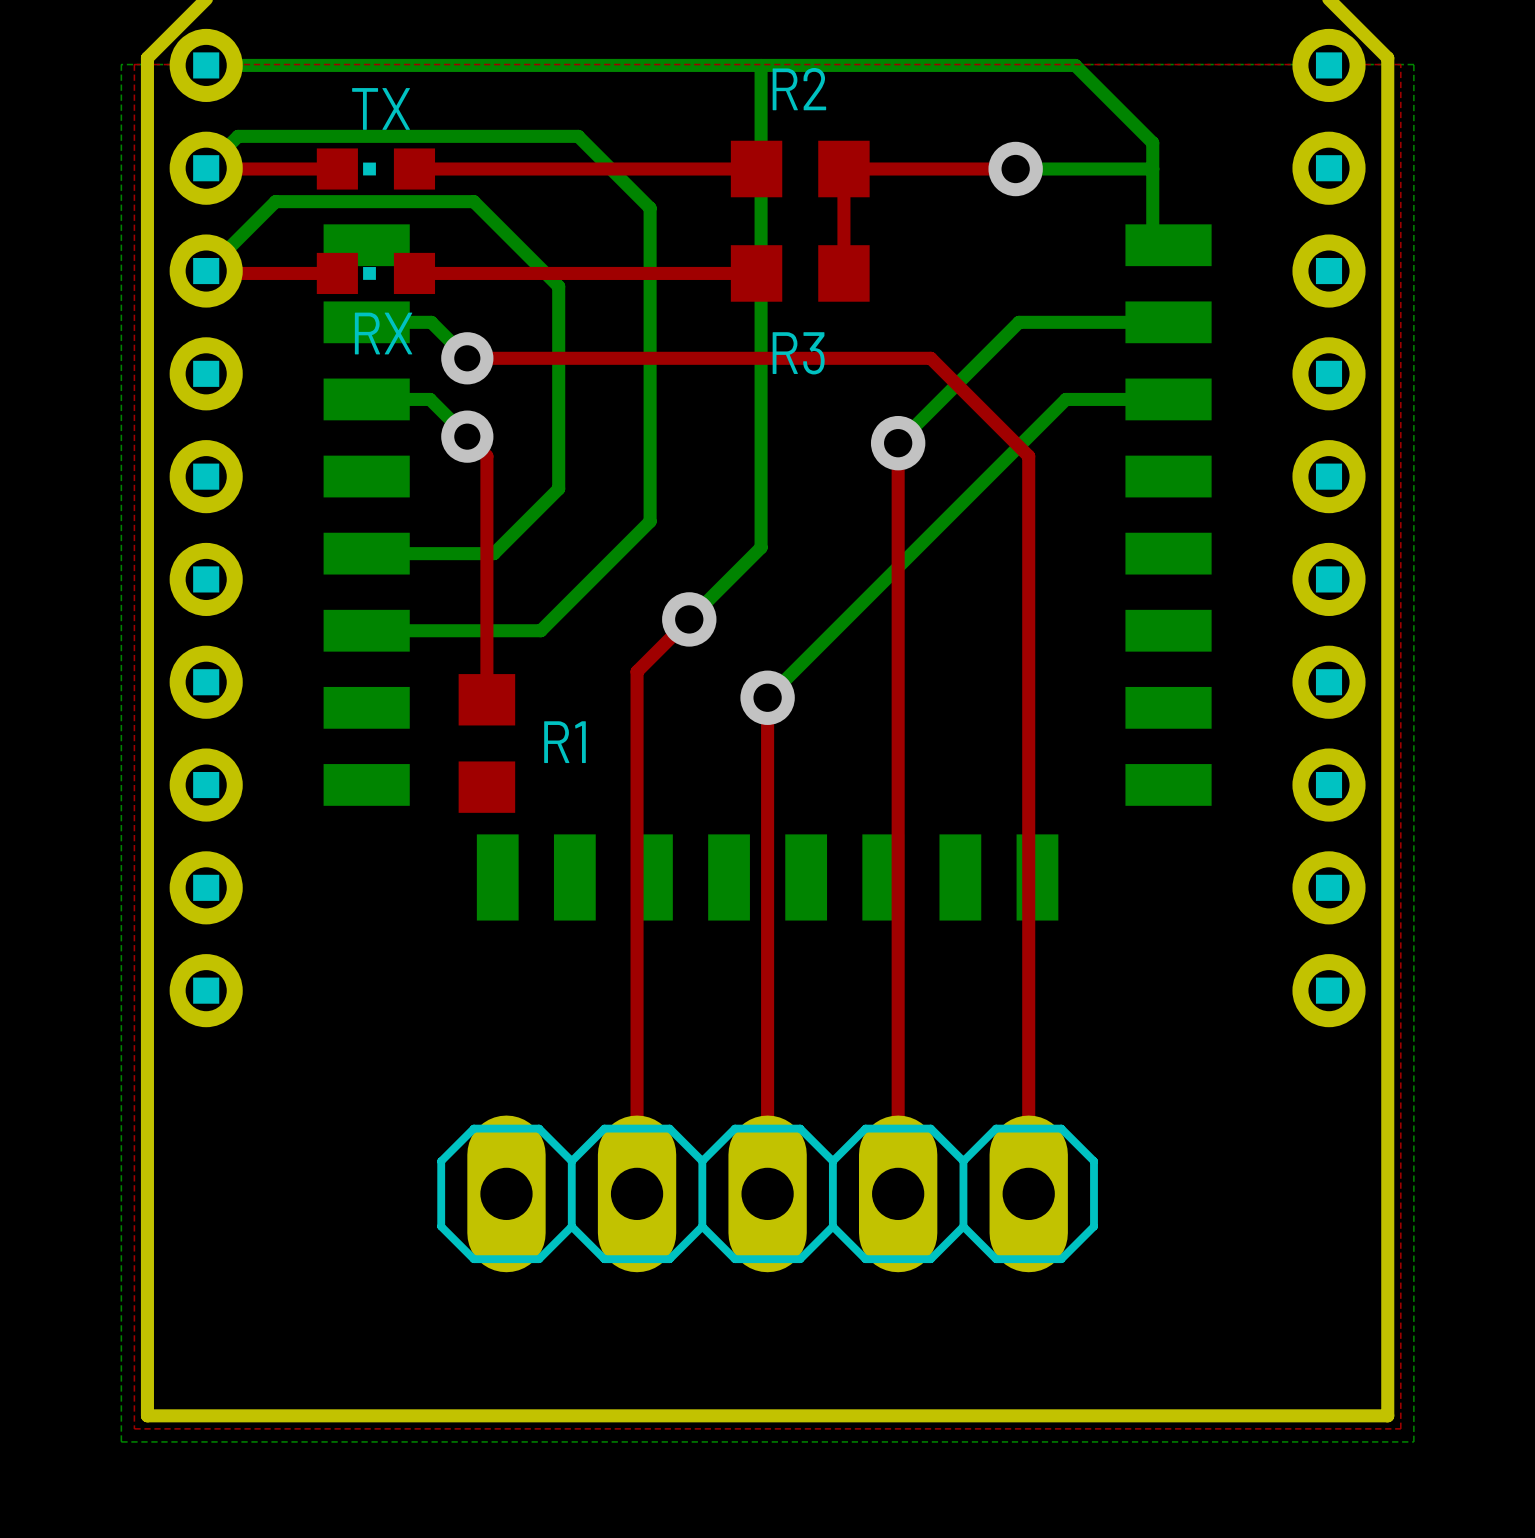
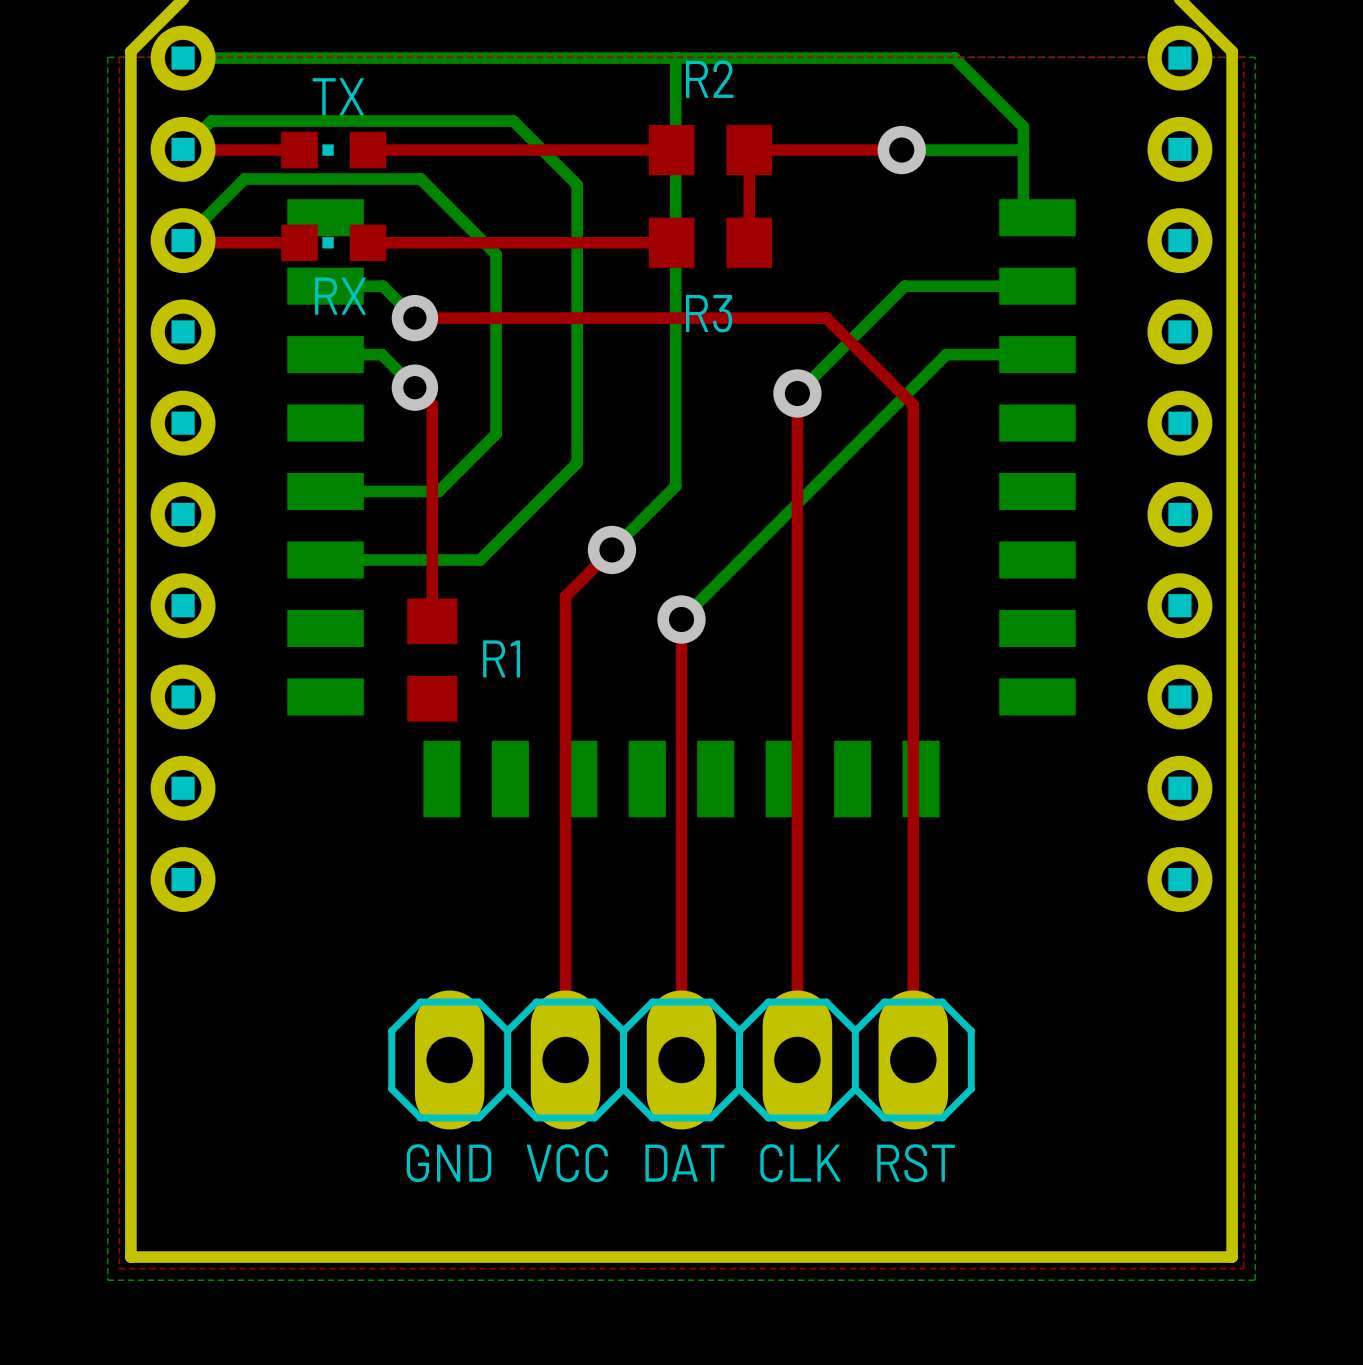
text: none -> GND (449, 1163)
text: none -> VCC (567, 1163)
text: none -> DAT (684, 1163)
text: none -> CLK (800, 1163)
text: none -> RST (916, 1163)

